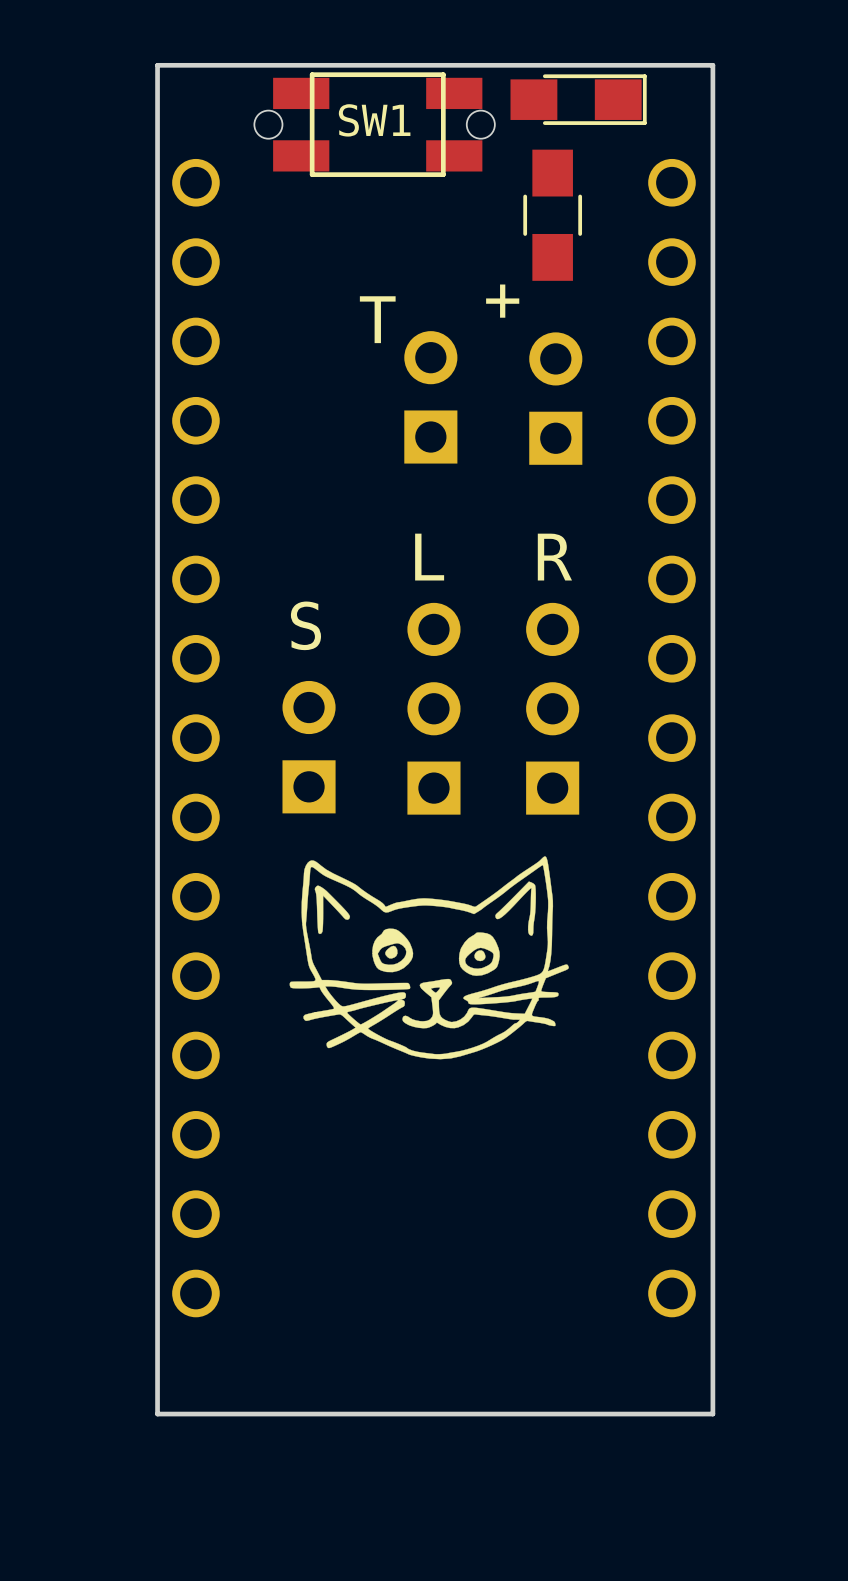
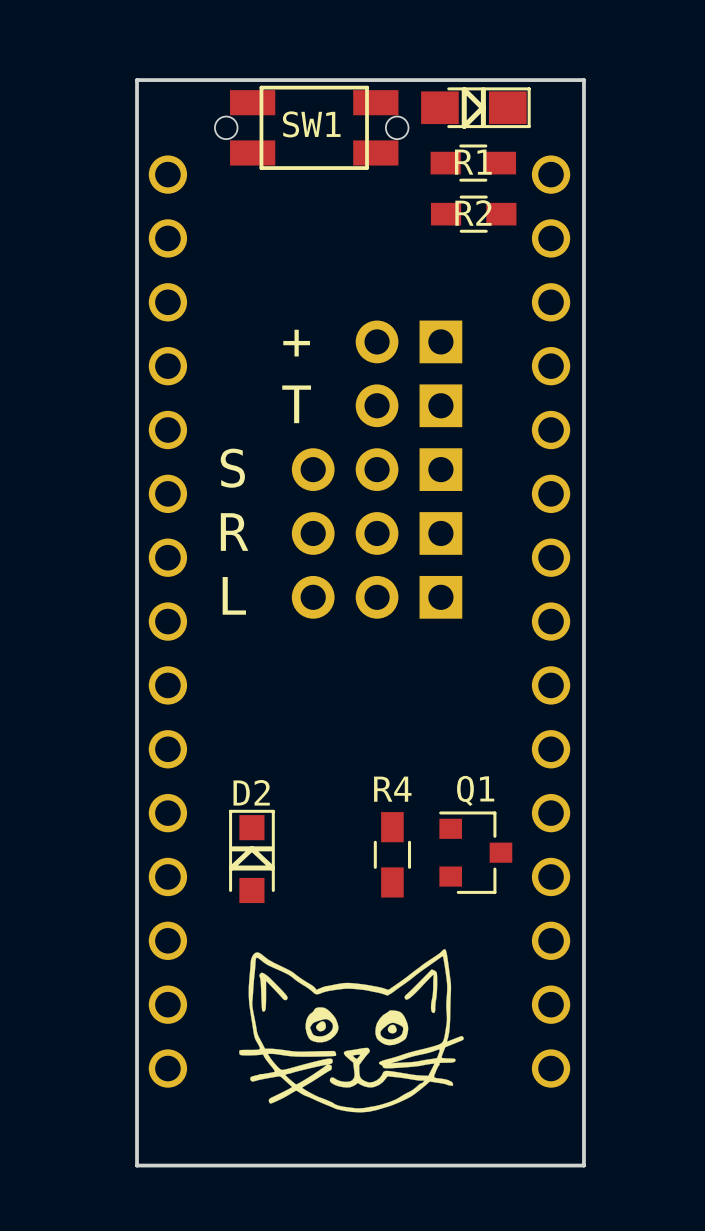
line: none -> (483, 89) (483, 124)
line: none -> (483, 107) (464, 126) (464, 89) (483, 108)
R1: none -> (473, 163)
part: (552, 215) -> none
R2: none -> (473, 214)
text position: + (502, 301) -> + (296, 343)
text position: T (377, 319) -> T (296, 404)
part: none -> (408, 341)
part: (430, 397) -> none
part: (555, 398) -> none
part: none -> (408, 405)
part: none -> (377, 469)
text position: L (429, 557) -> L (234, 595)
text position: R (554, 557) -> R (234, 532)
text position: S (305, 625) -> S (232, 468)
part: none -> (377, 533)
part rotation: 0° (433, 708) -> 90° counterclockwise (377, 597)
part: (552, 708) -> none
part: (309, 747) -> none
drawing position: (429, 957) -> (351, 1030)
line: none -> (232, 848) (271, 848)
line: none -> (251, 848) (272, 868) (231, 868) (251, 848)
Q1: none -> (475, 852)
R4: none -> (392, 854)
D2: none -> (251, 856)

